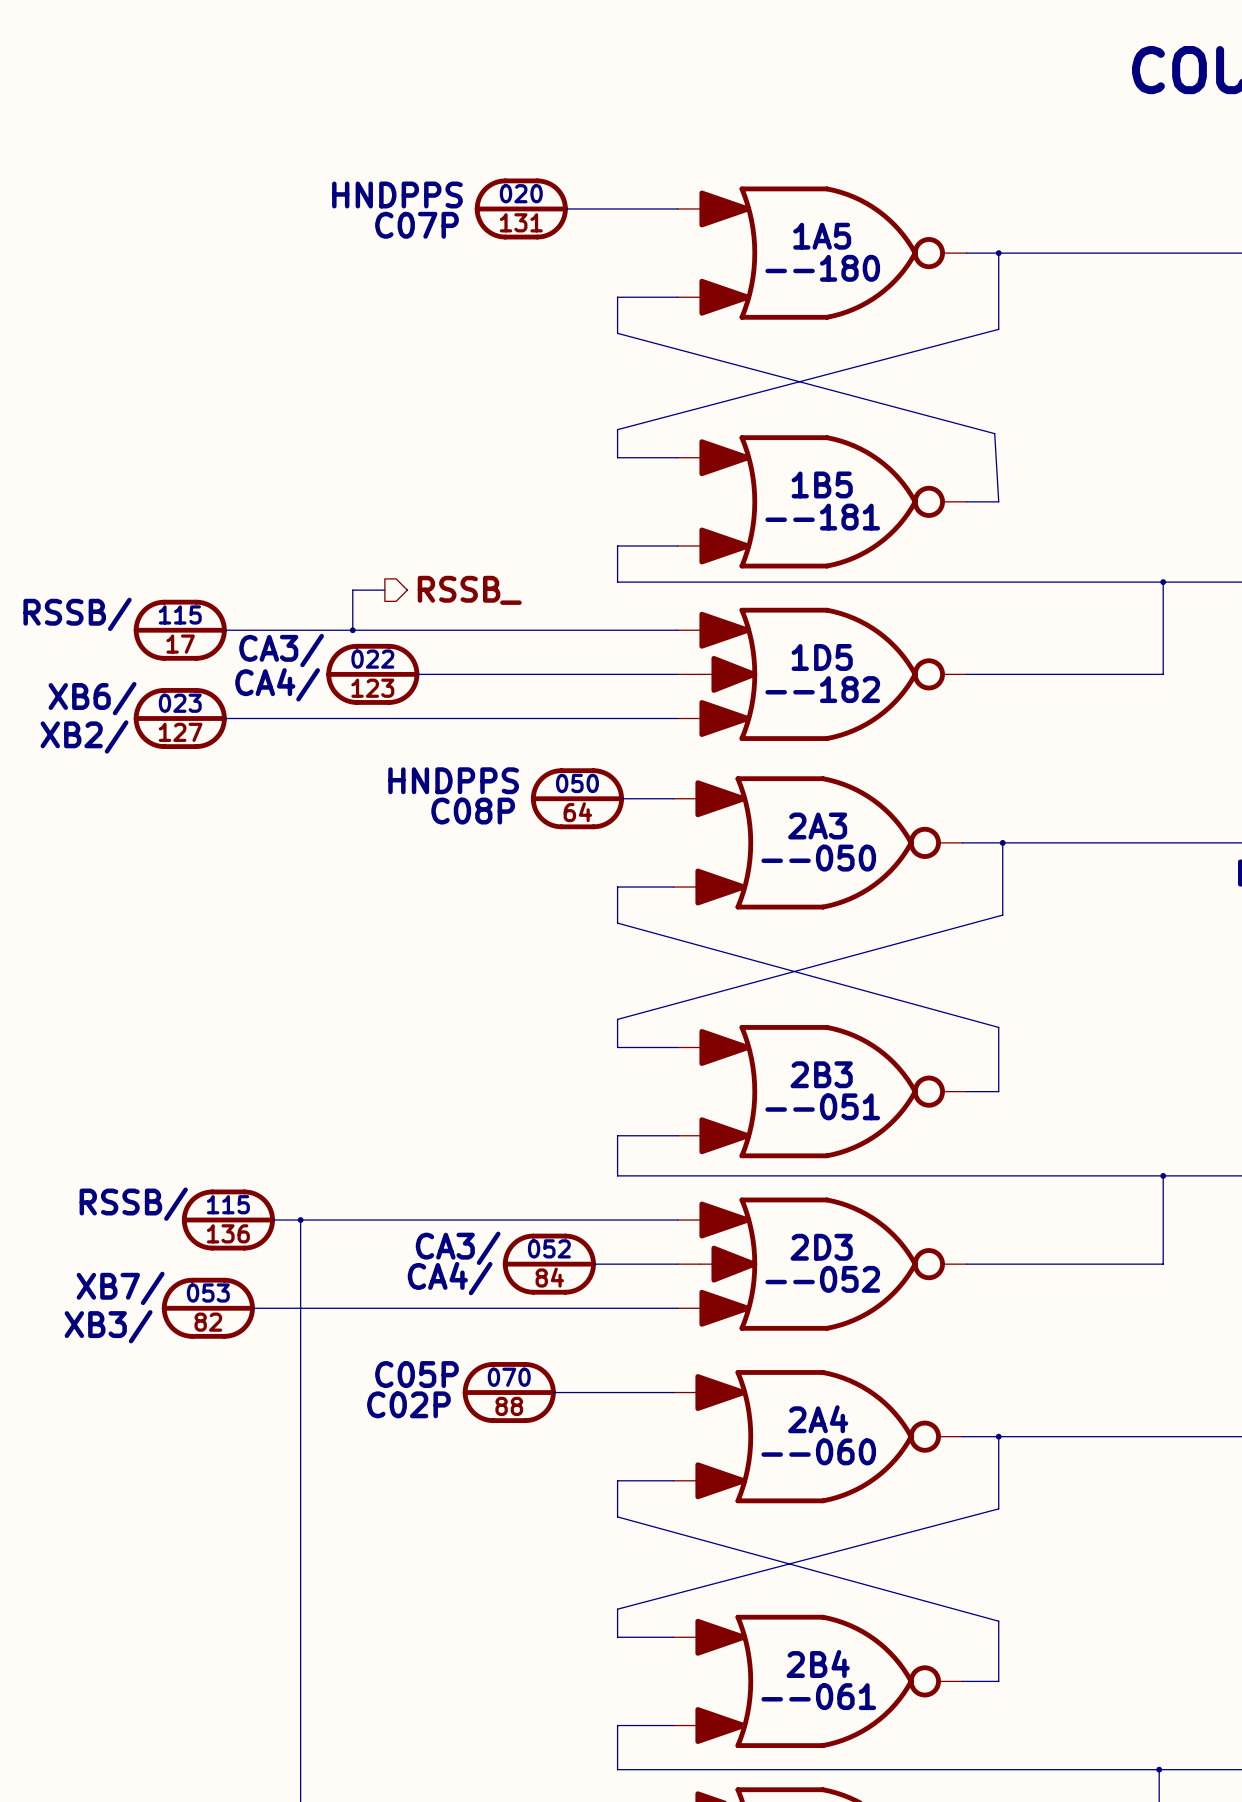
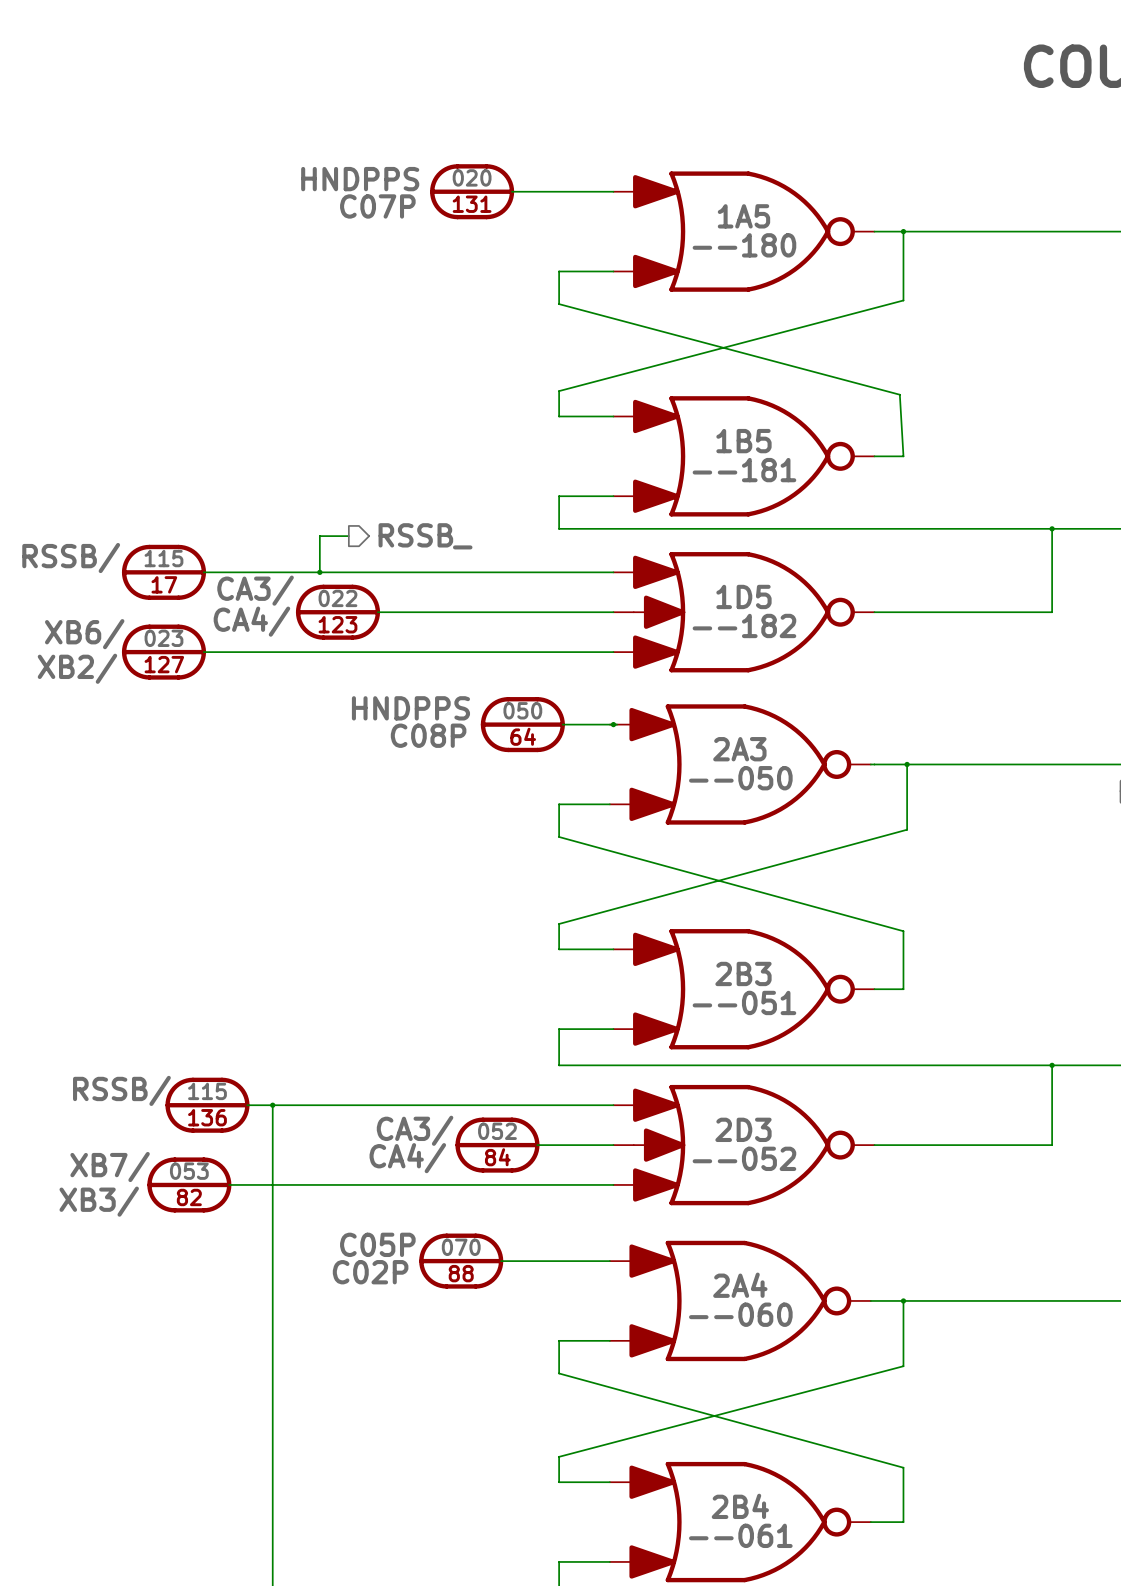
junction: none -> (613, 724)

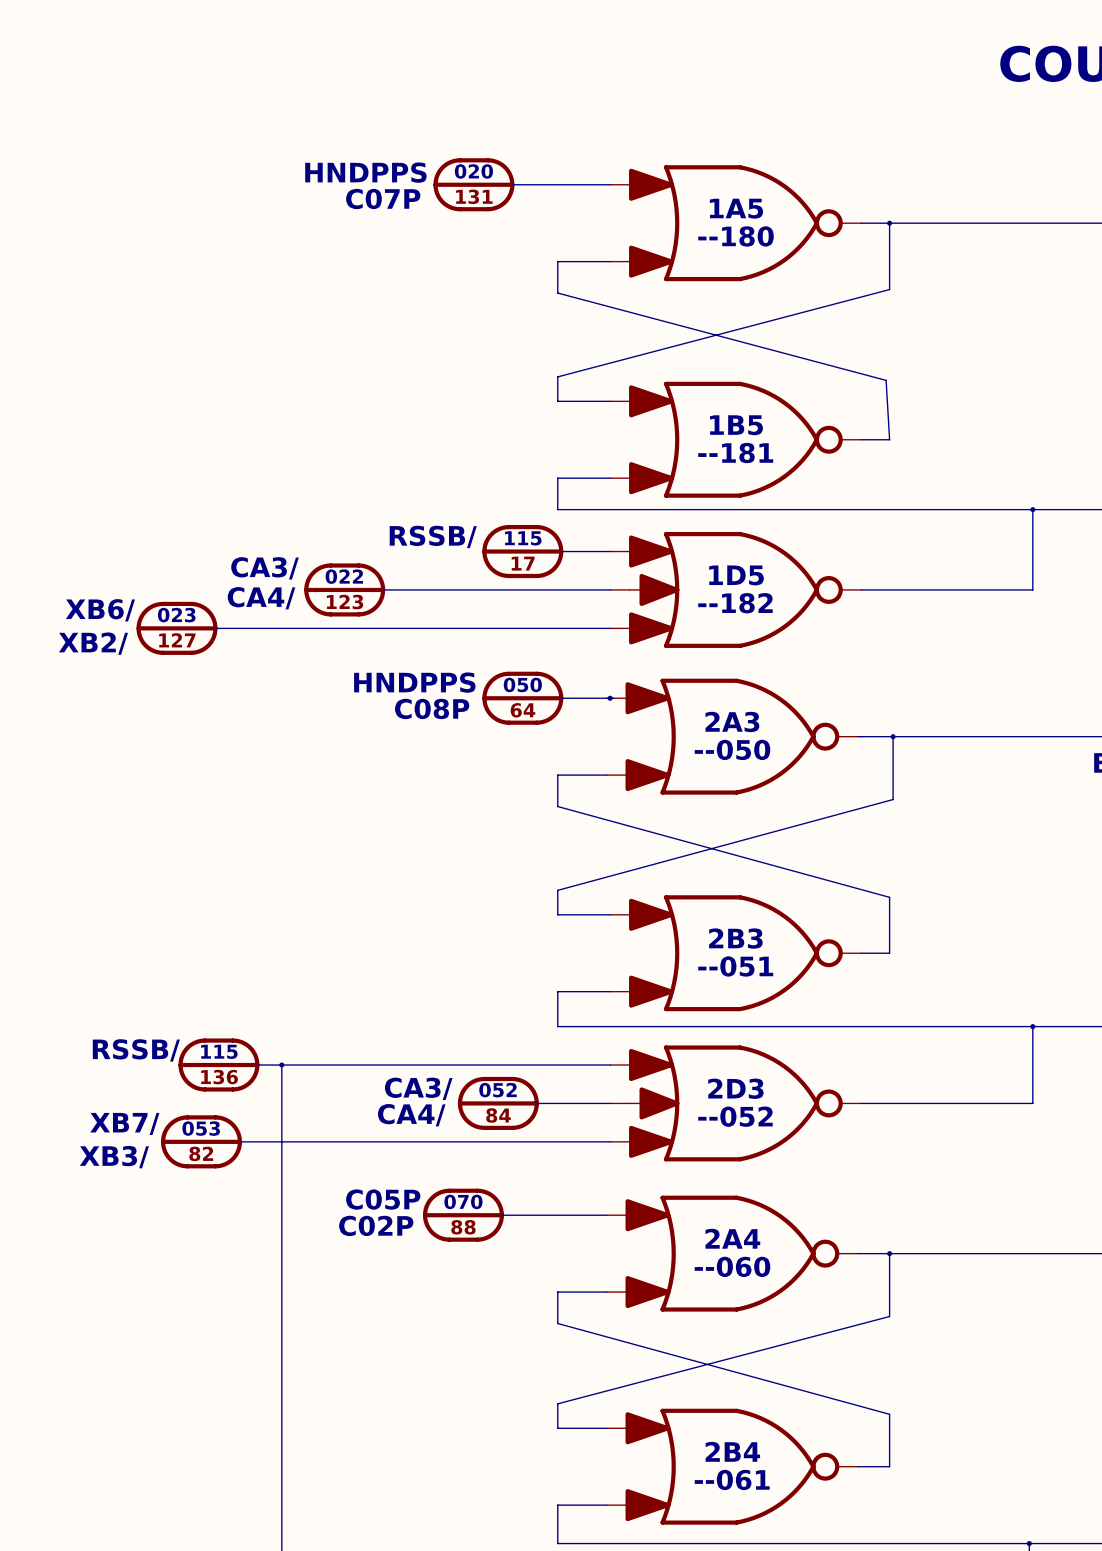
wire: (348, 536) (319, 536) (319, 572) -> none
hierarchical label: RSSB_ (425, 536) -> none
part: (163, 572) -> none
wire: (203, 572) (562, 572) -> none
junction: (319, 572) -> none
part: none -> (522, 551)

